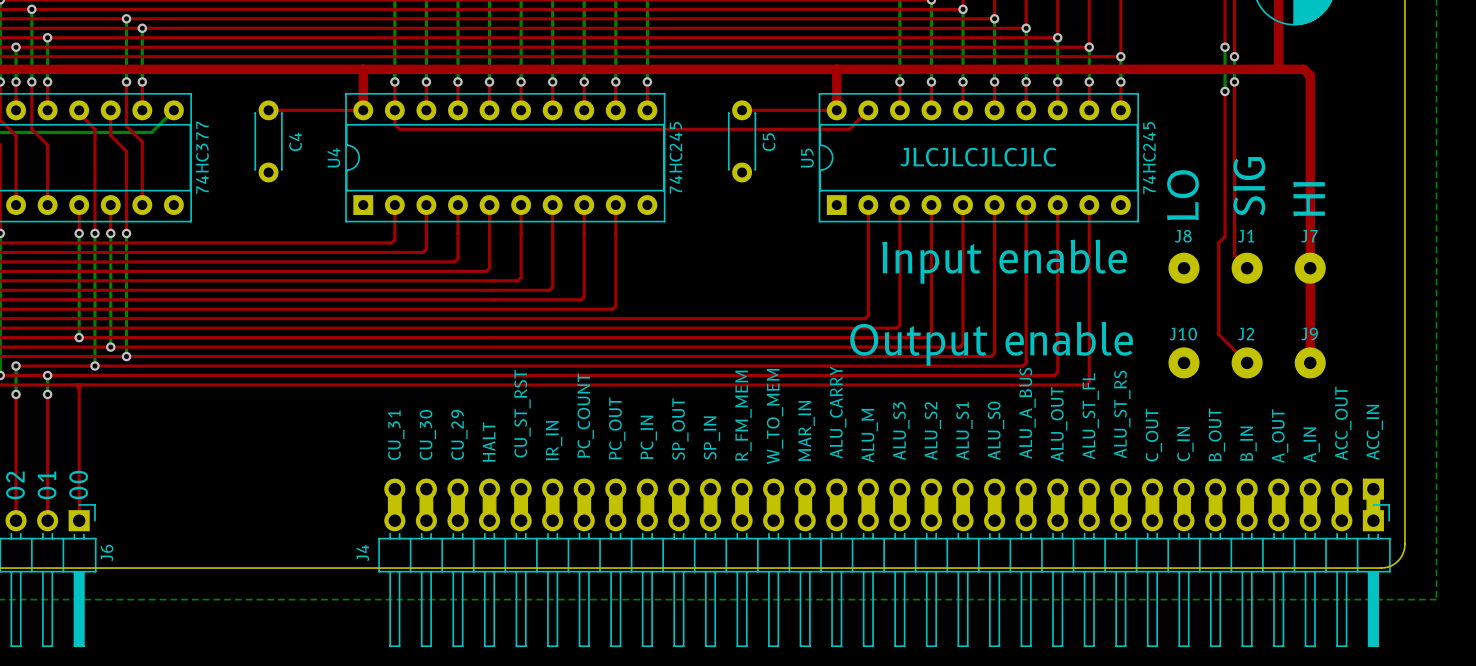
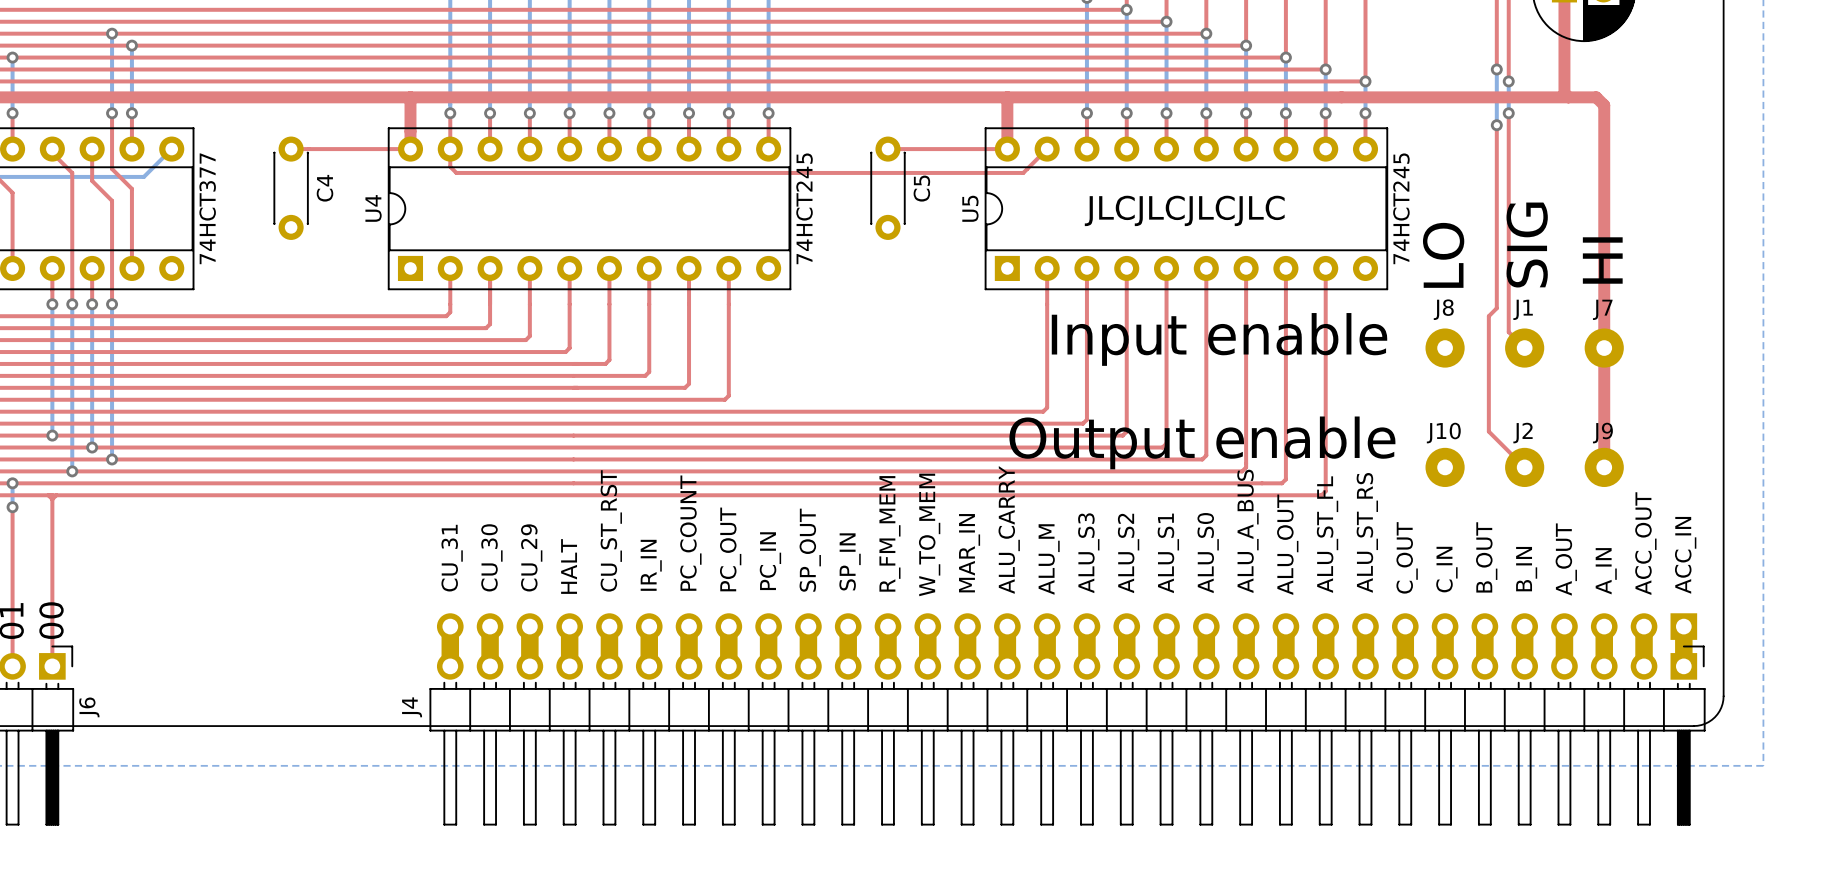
part value: 74HC377 (202, 157) -> 74HCT377 (207, 208)
U4 value: 74HC245 (675, 157) -> 74HCT245 (804, 208)
U5 value: 74HC245 (1149, 157) -> 74HCT245 (1401, 208)

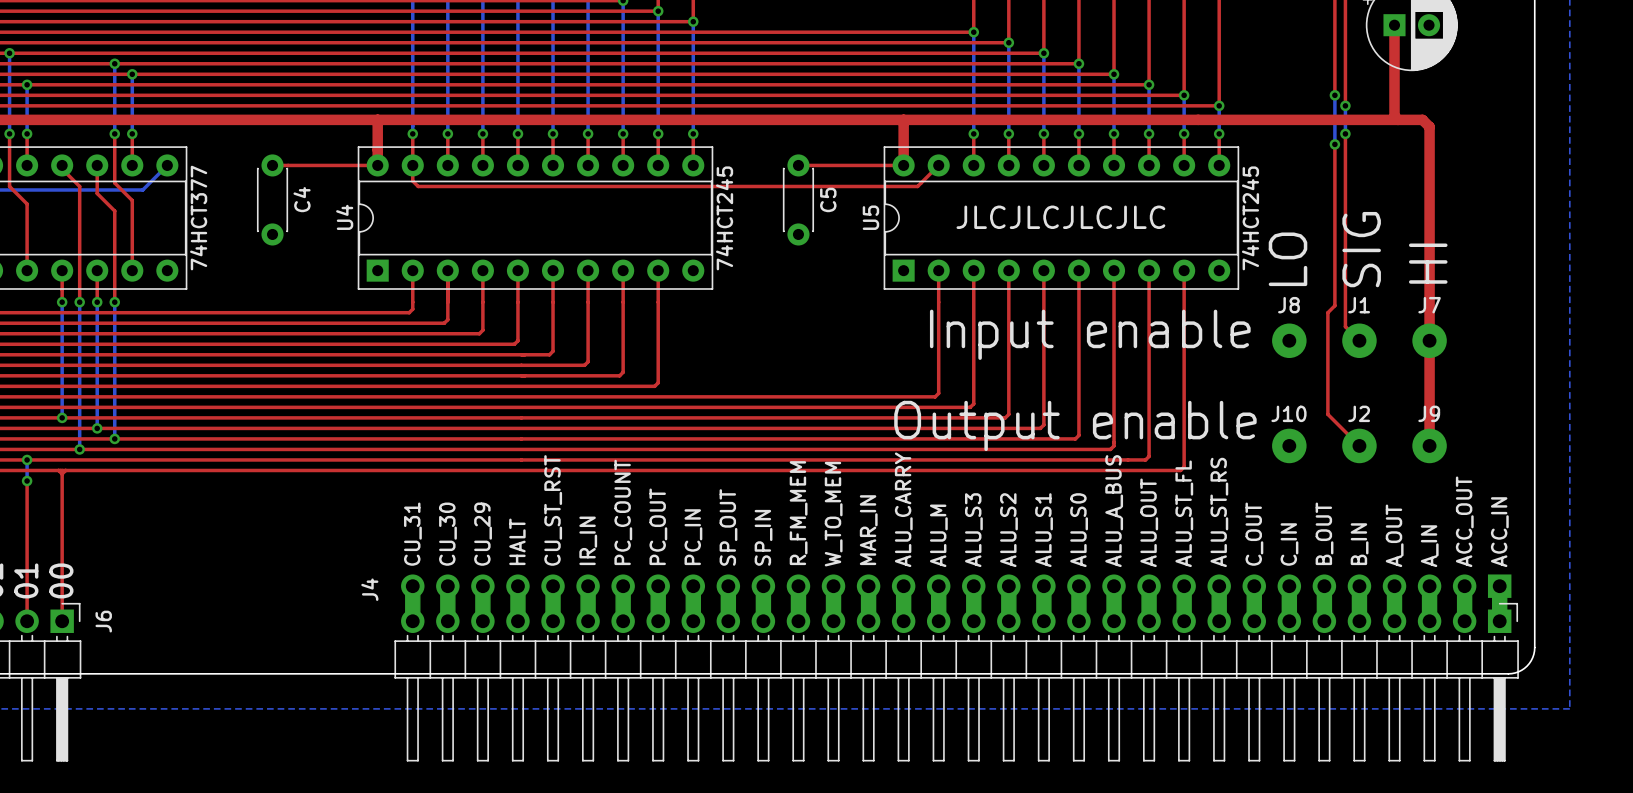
J4 footprint: [429, 613, 1706, 826] -> [394, 574, 1519, 762]
J6 name position: J6 (89, 707) -> J6 (103, 621)
J4 name position: J4 (412, 707) -> J4 (369, 589)

